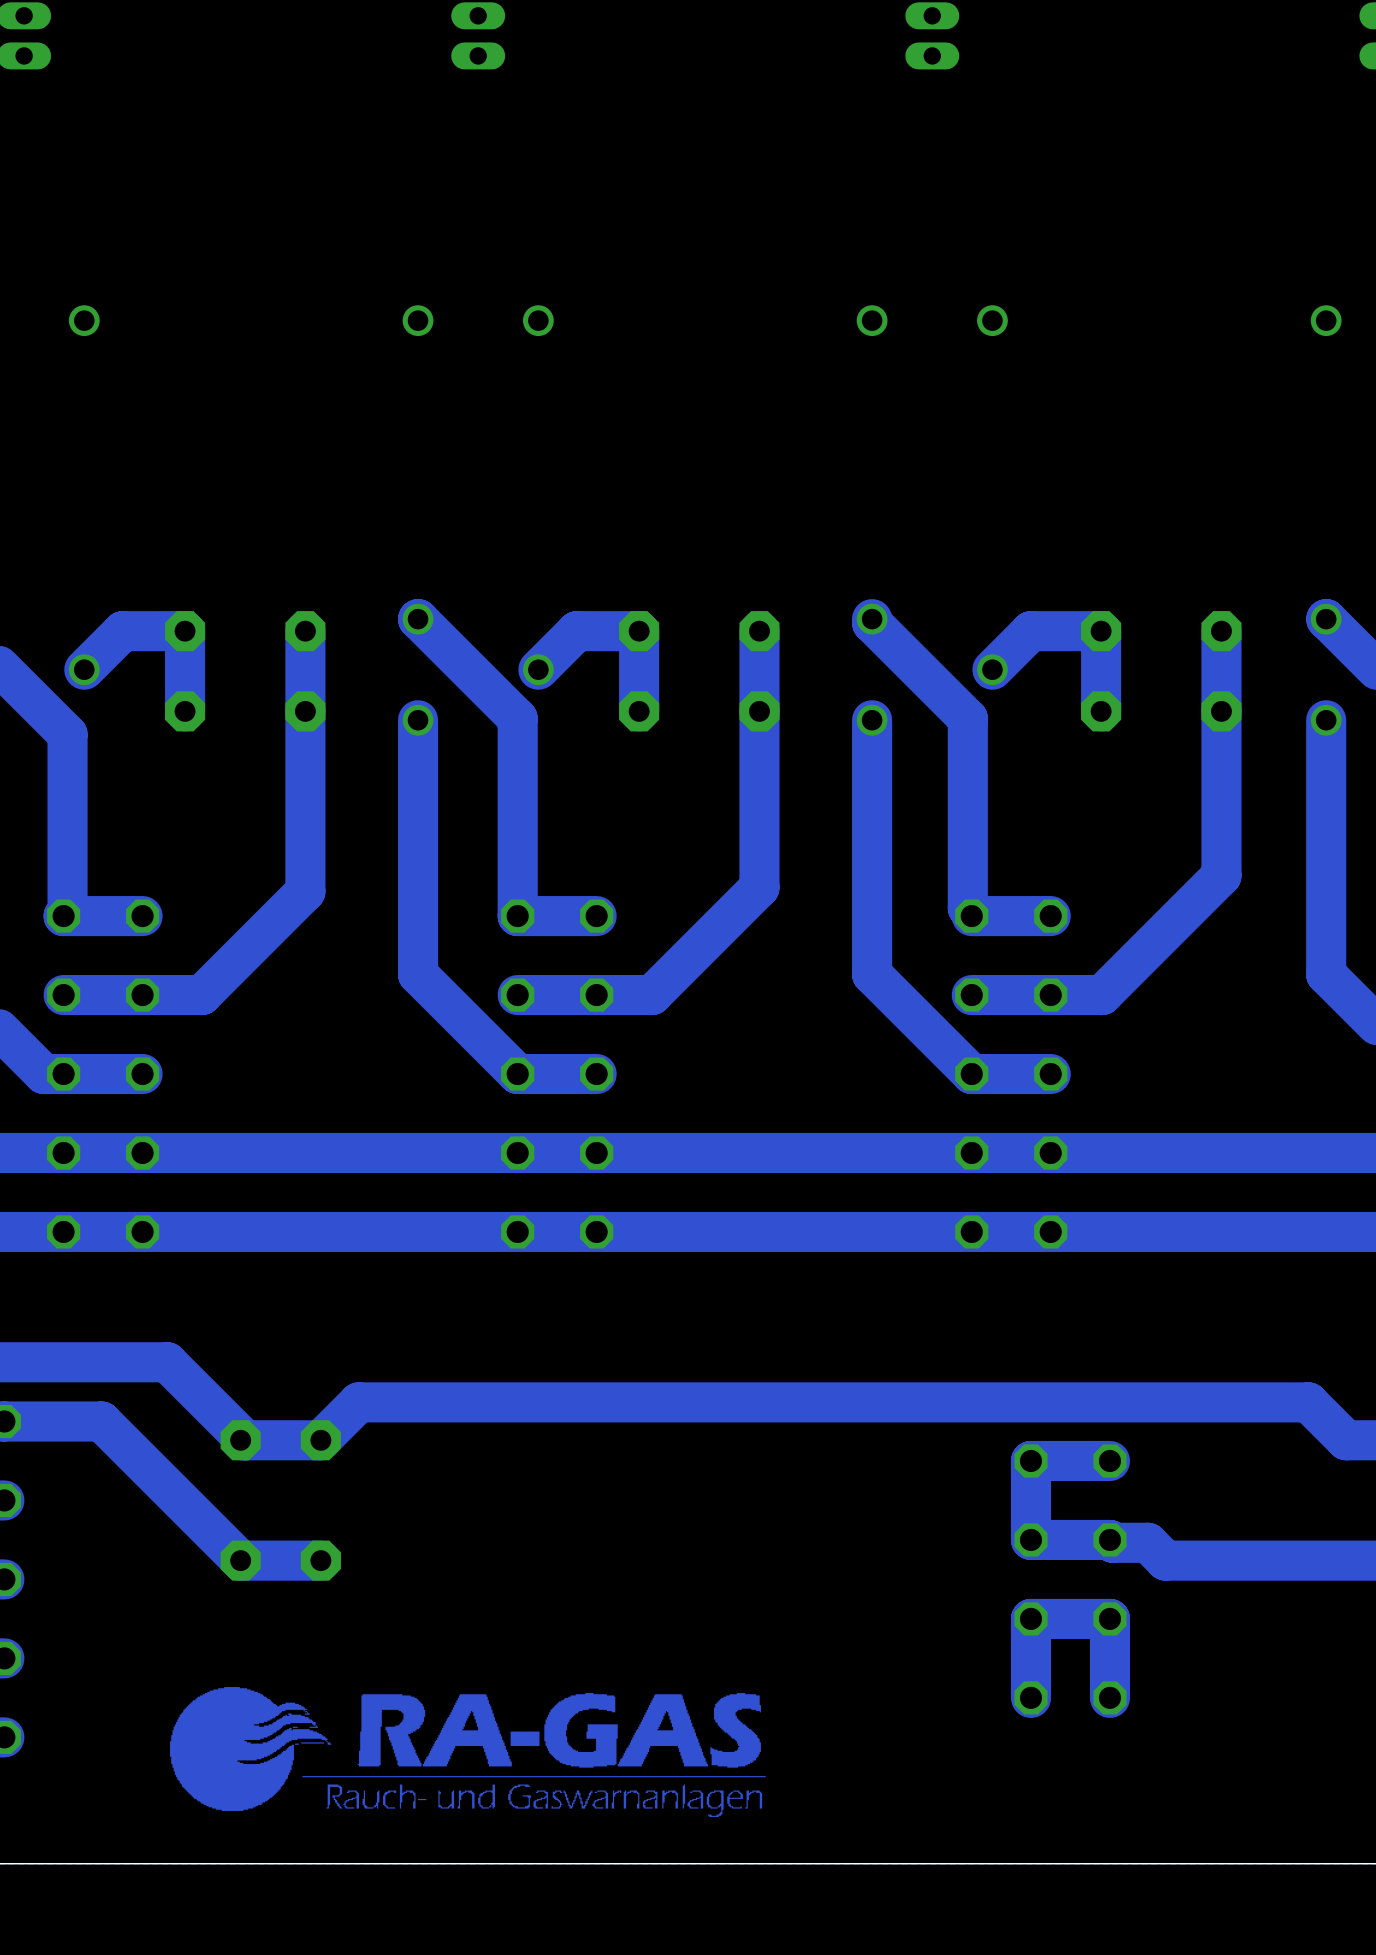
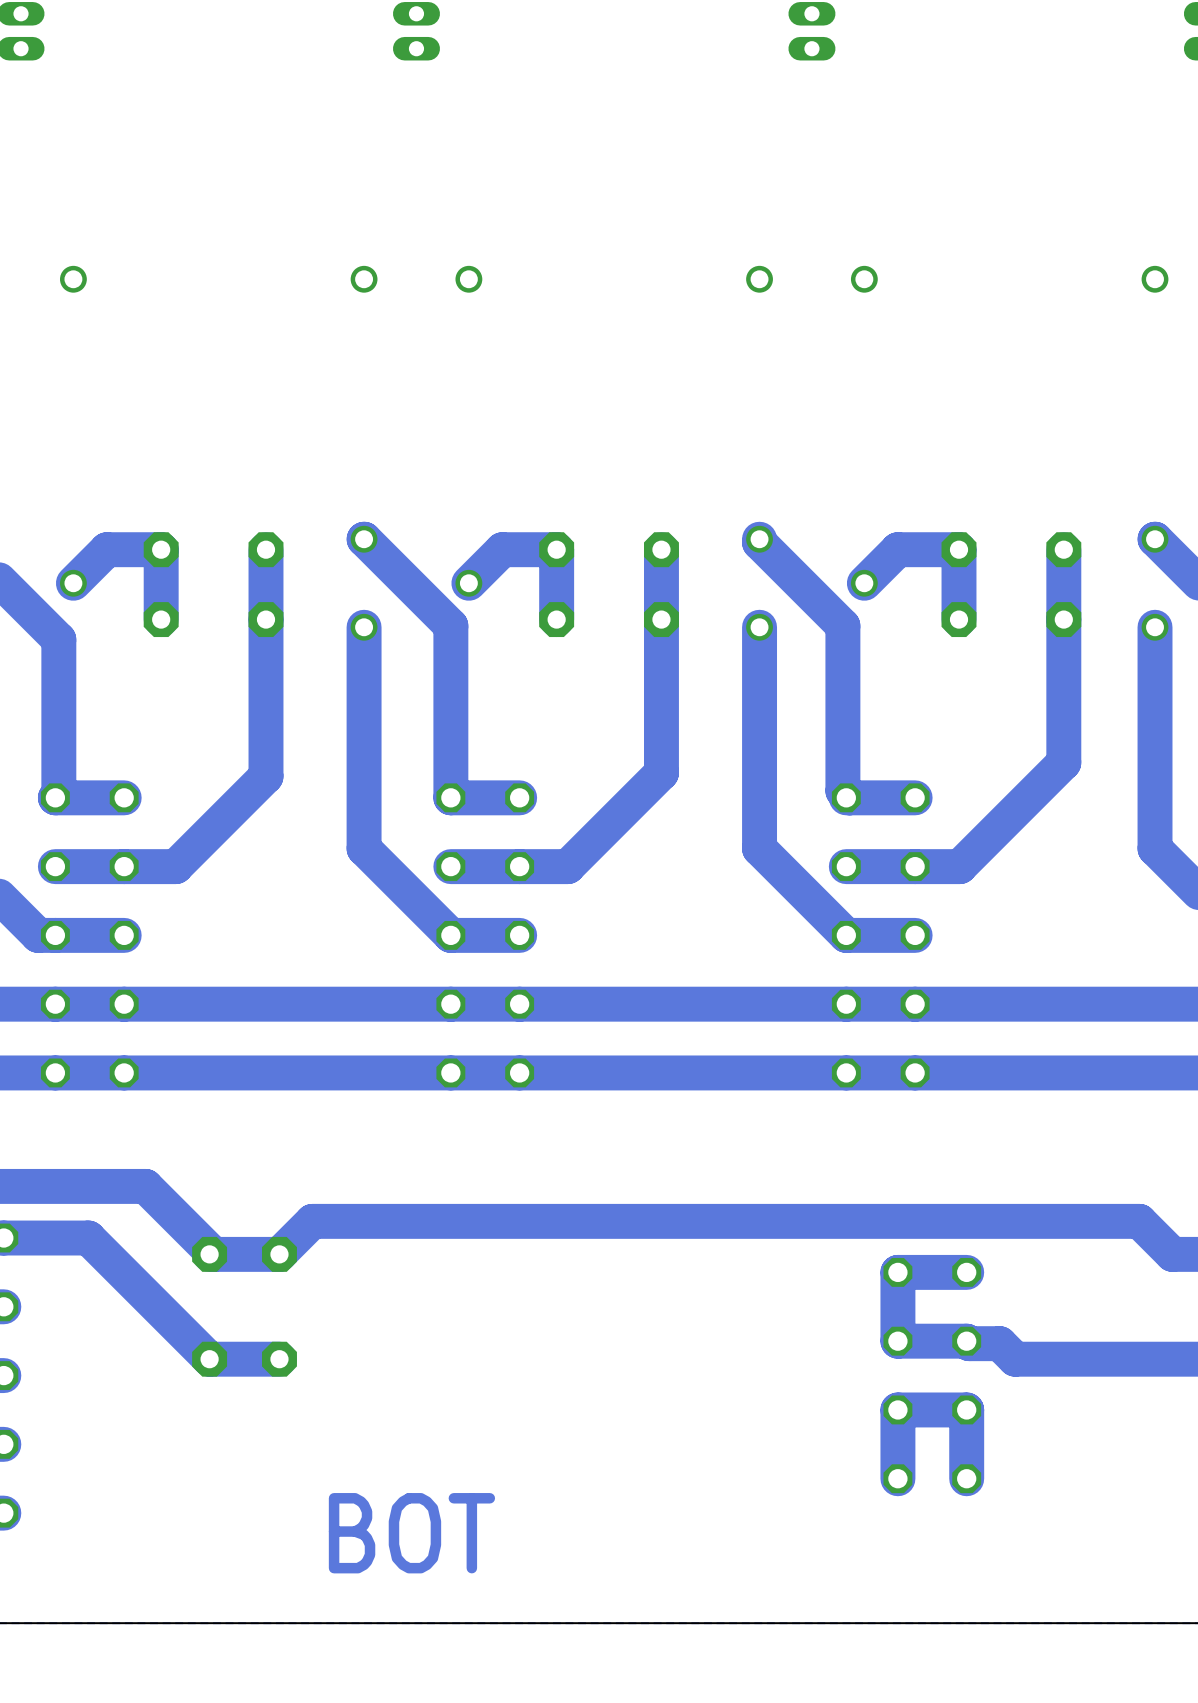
drawing: [170, 1687, 766, 1817] -> none
text: none -> BOT (411, 1533)

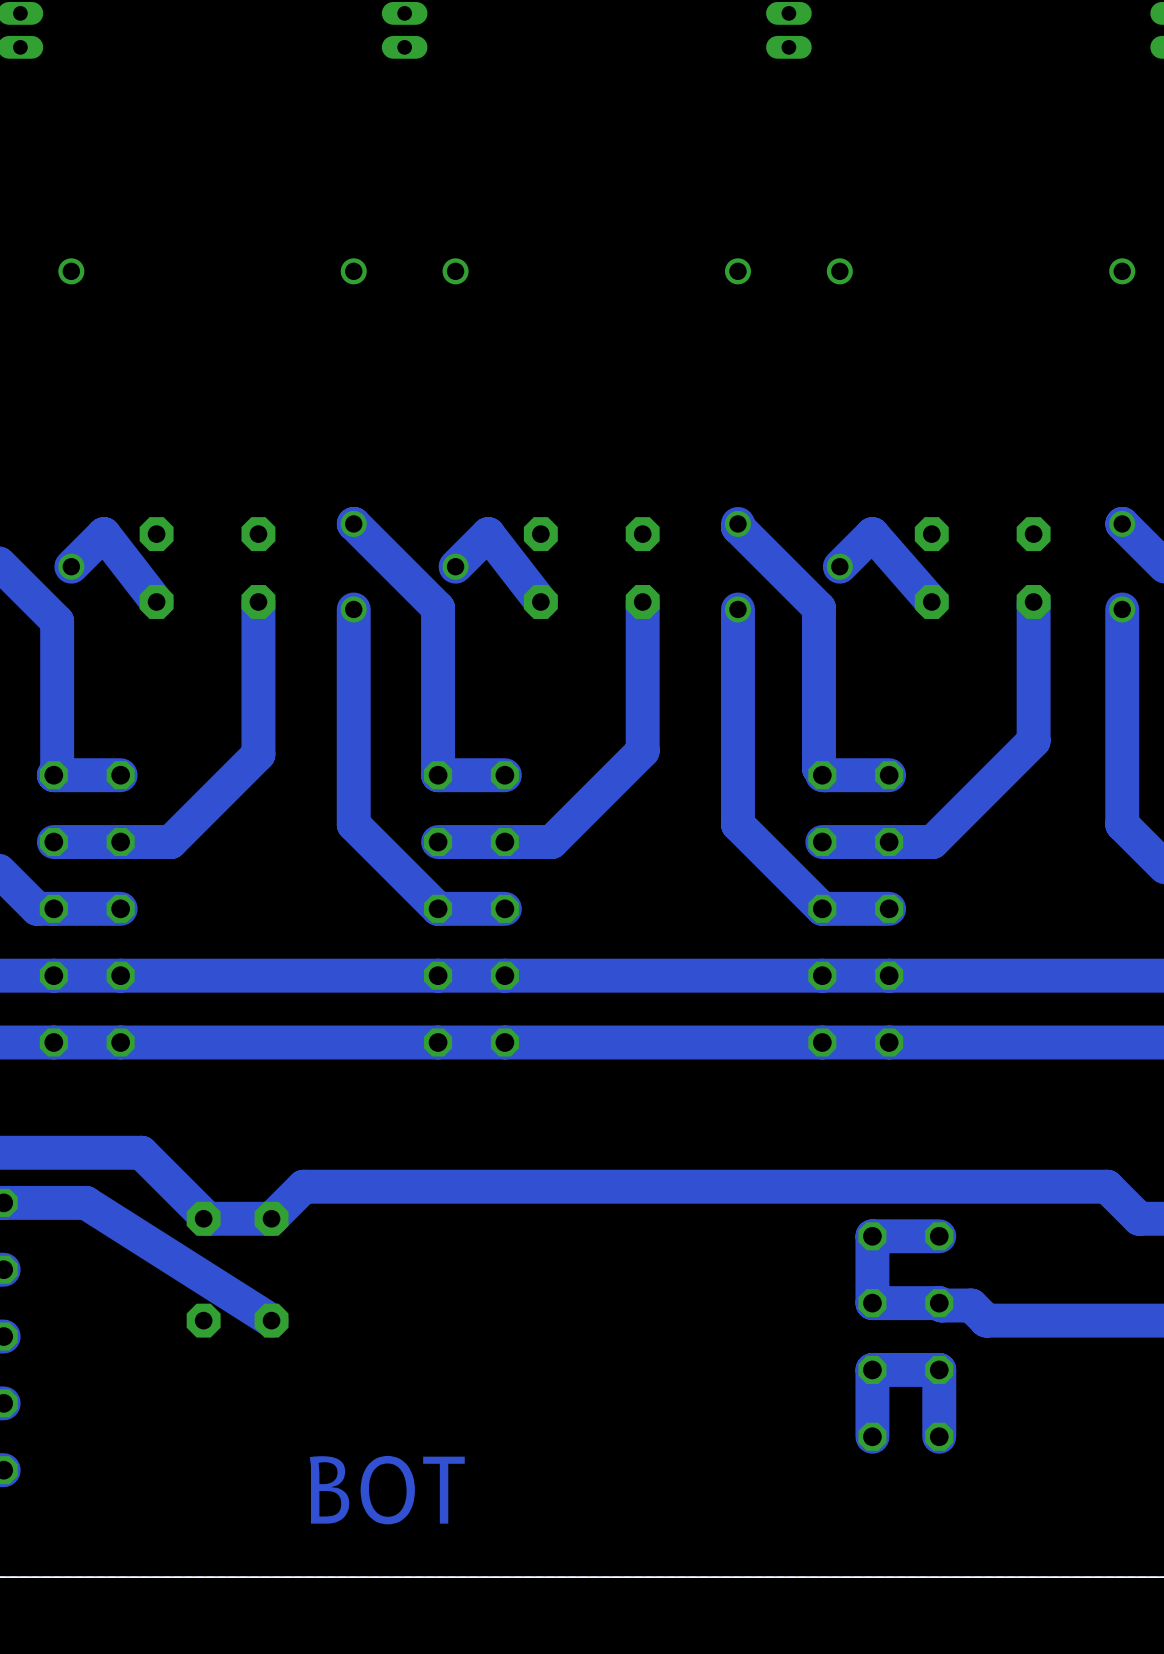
track: (106, 549) (161, 549) (161, 619) -> (103, 534) (156, 601)
track: (265, 549) (265, 619) -> none
track: (502, 549) (556, 549) (556, 619) -> (488, 534) (540, 601)
track: (661, 549) (661, 619) -> none
track: (897, 549) (958, 549) (958, 619) -> (872, 534) (931, 601)
track: (1063, 549) (1063, 619) -> none
track: (88, 1238) (209, 1359) (279, 1359) -> (85, 1202) (271, 1320)

